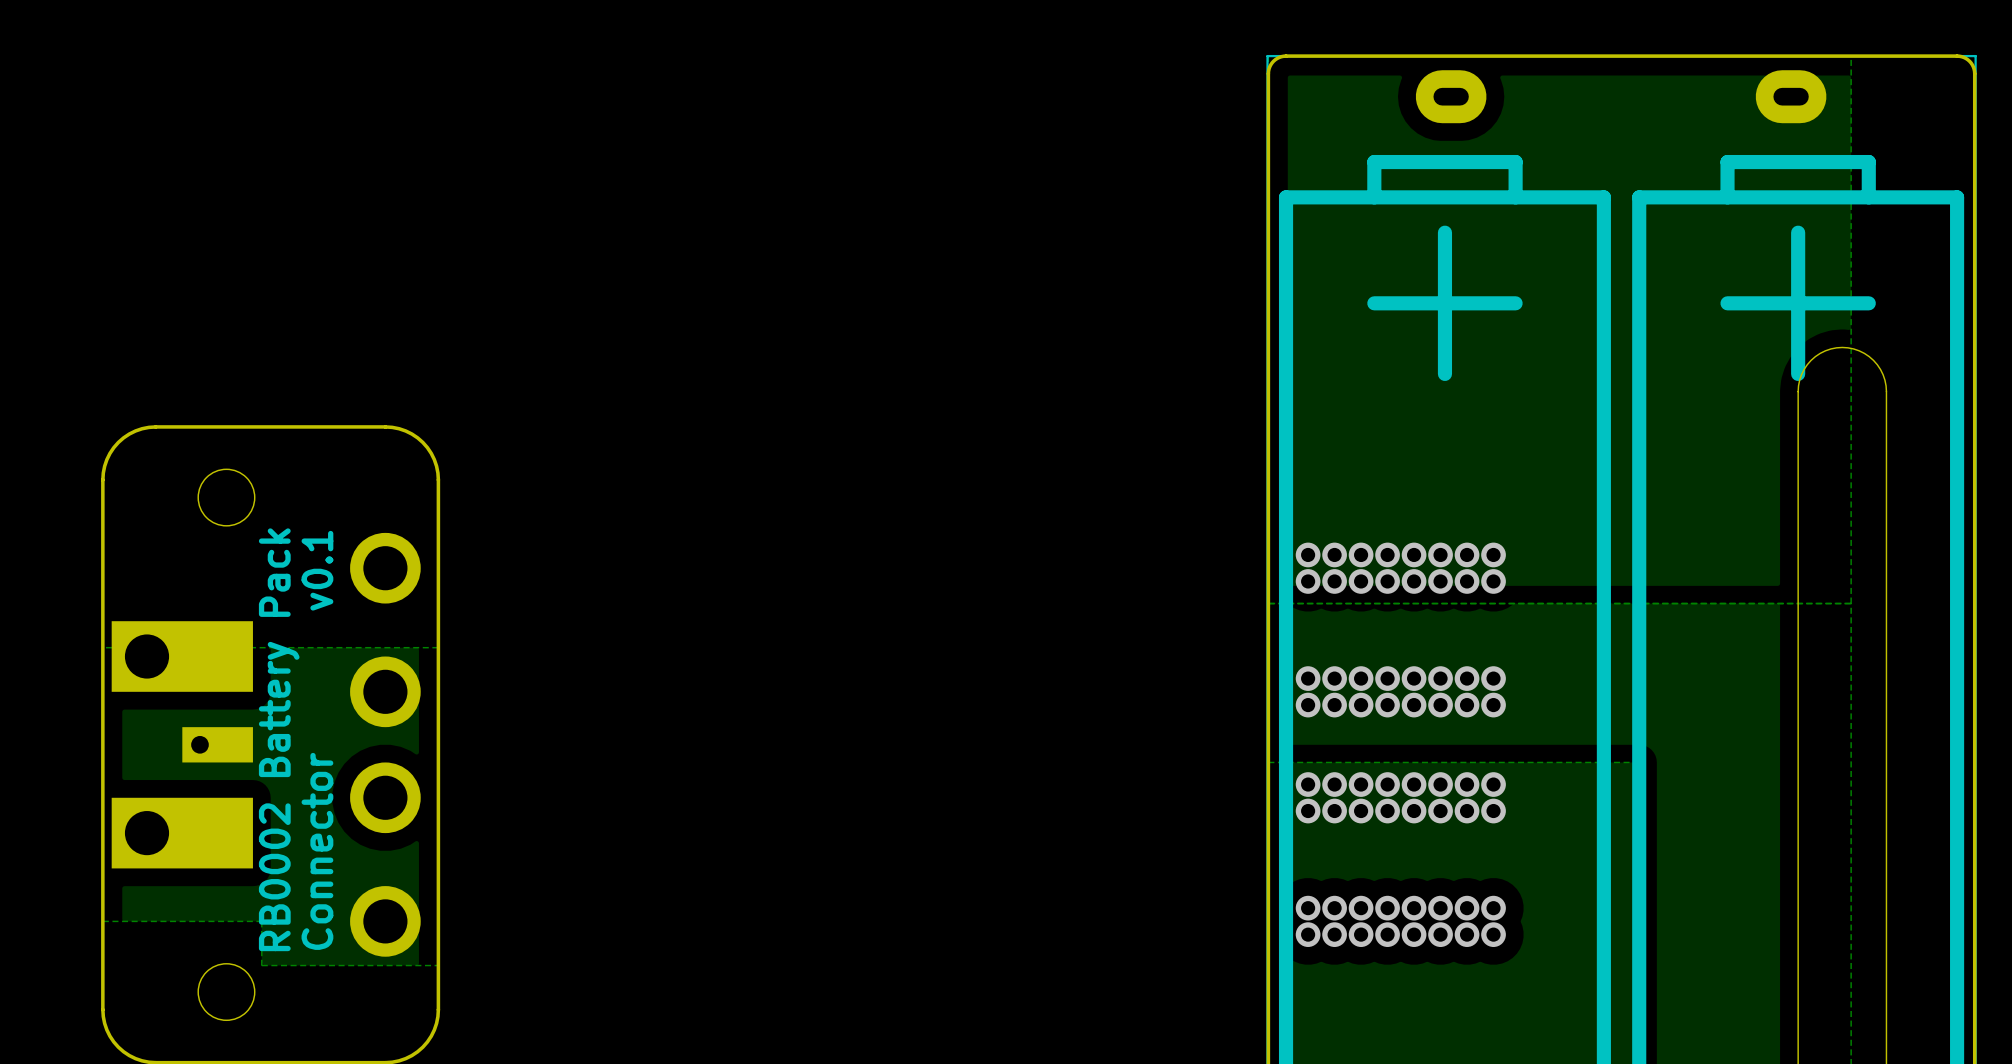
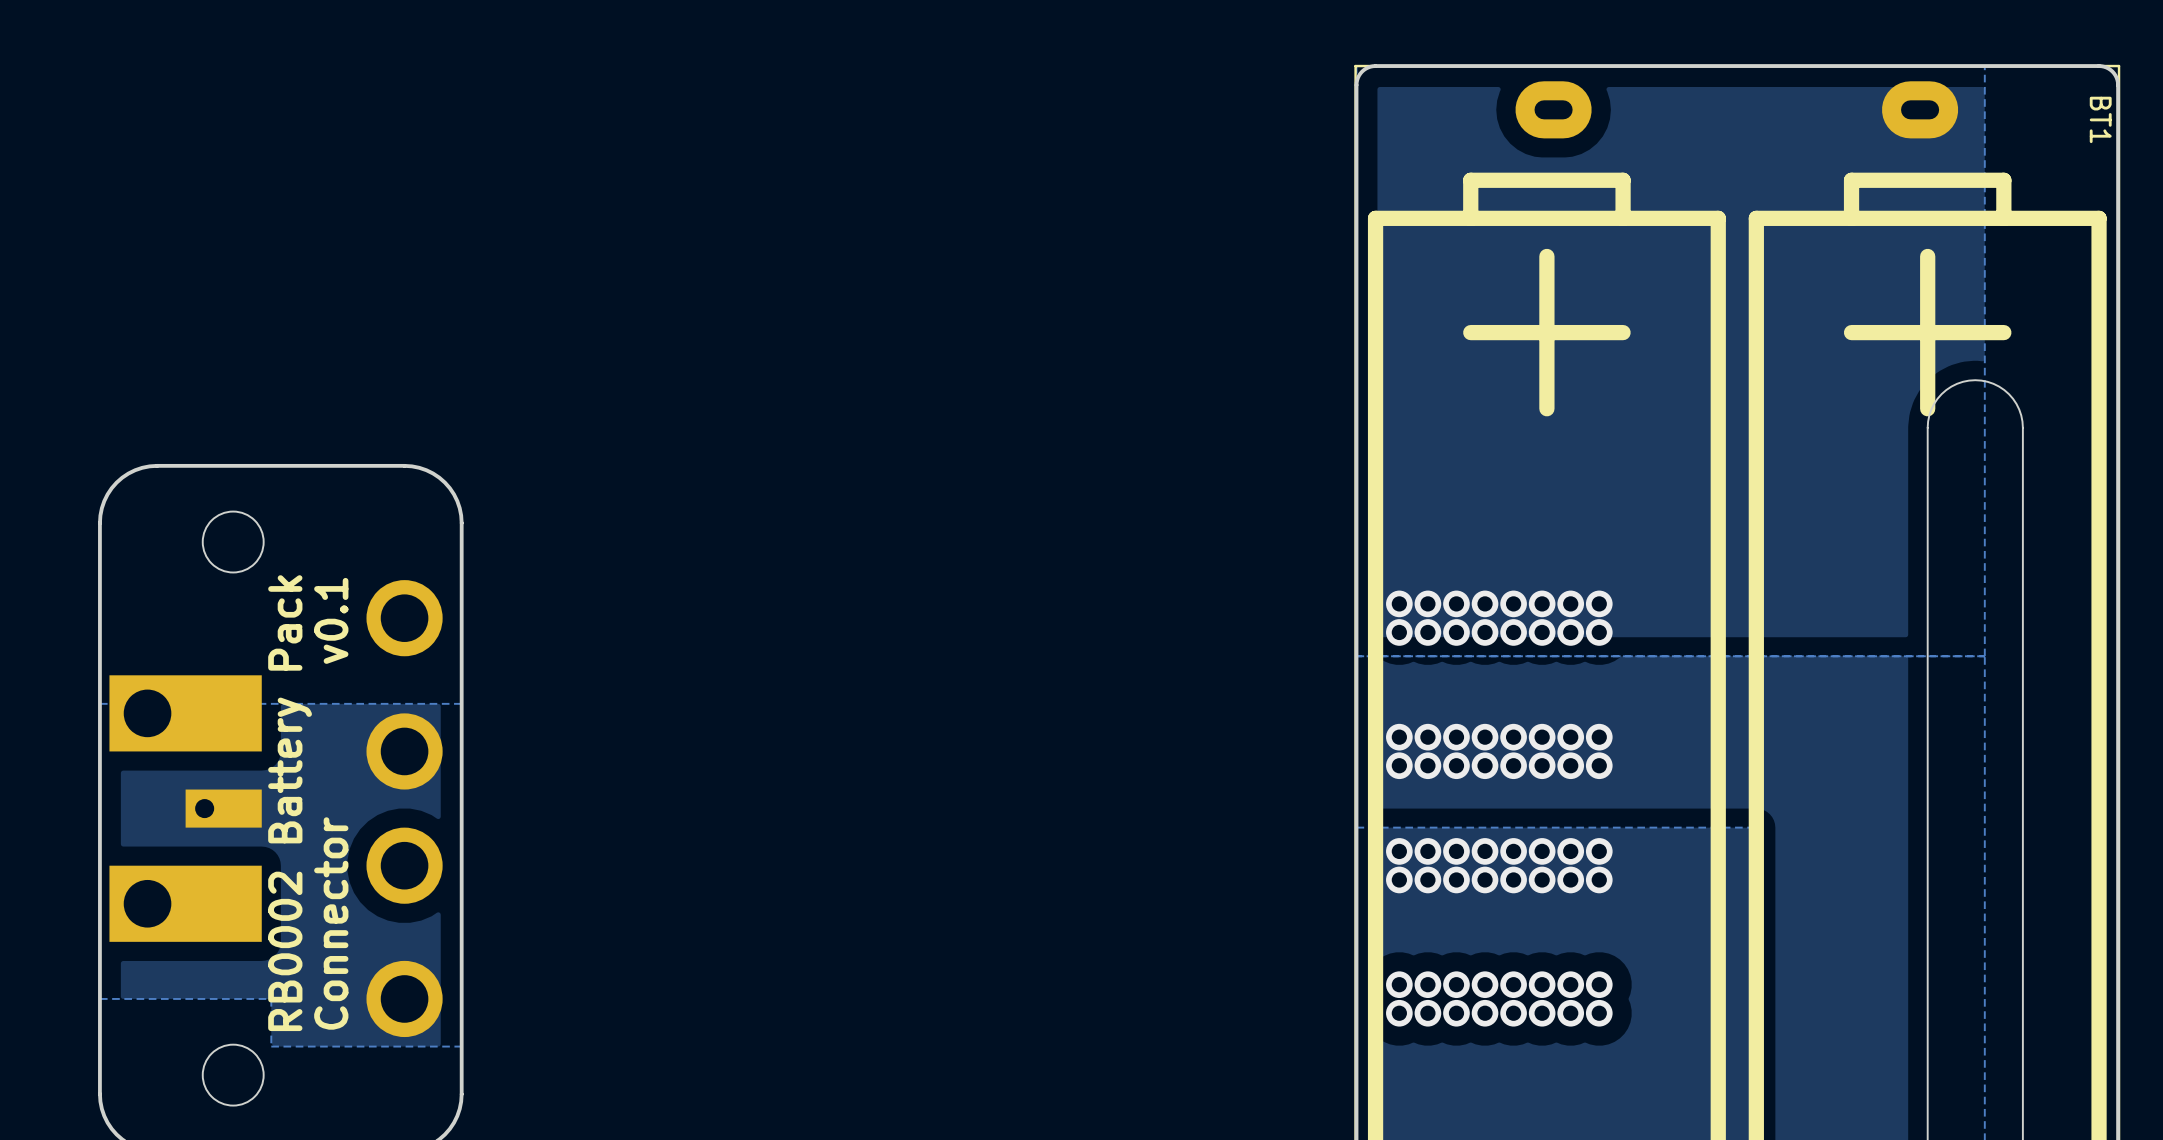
BT1 name: none -> BT1 (2100, 119)

